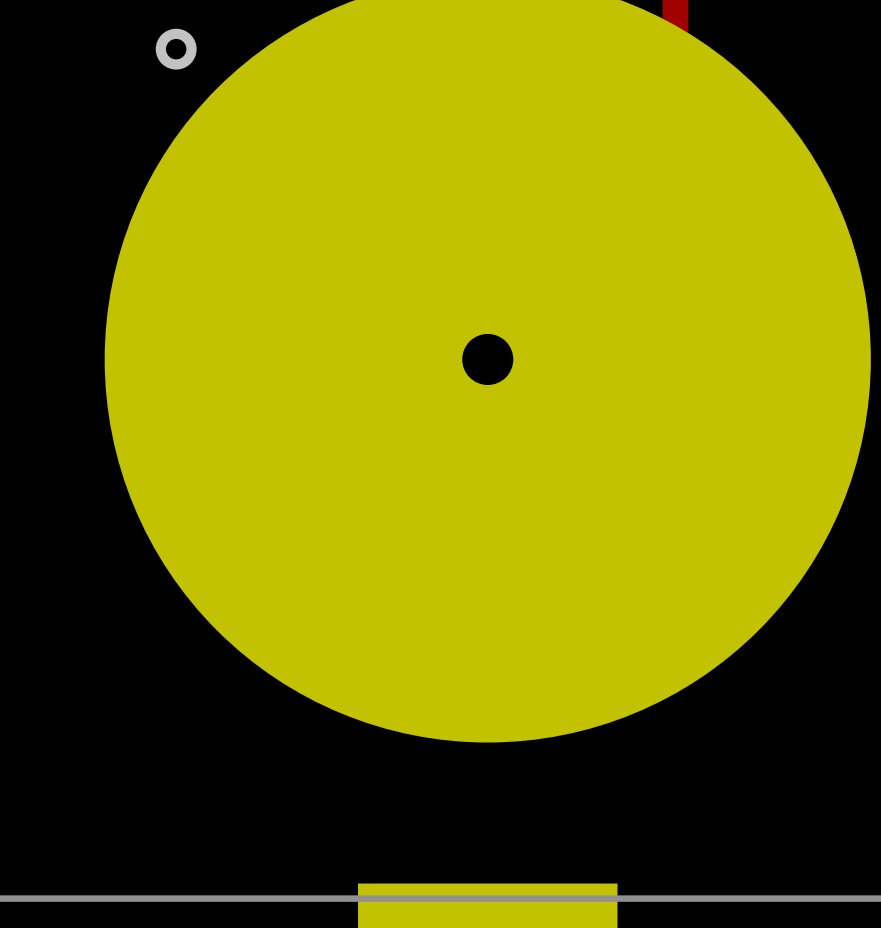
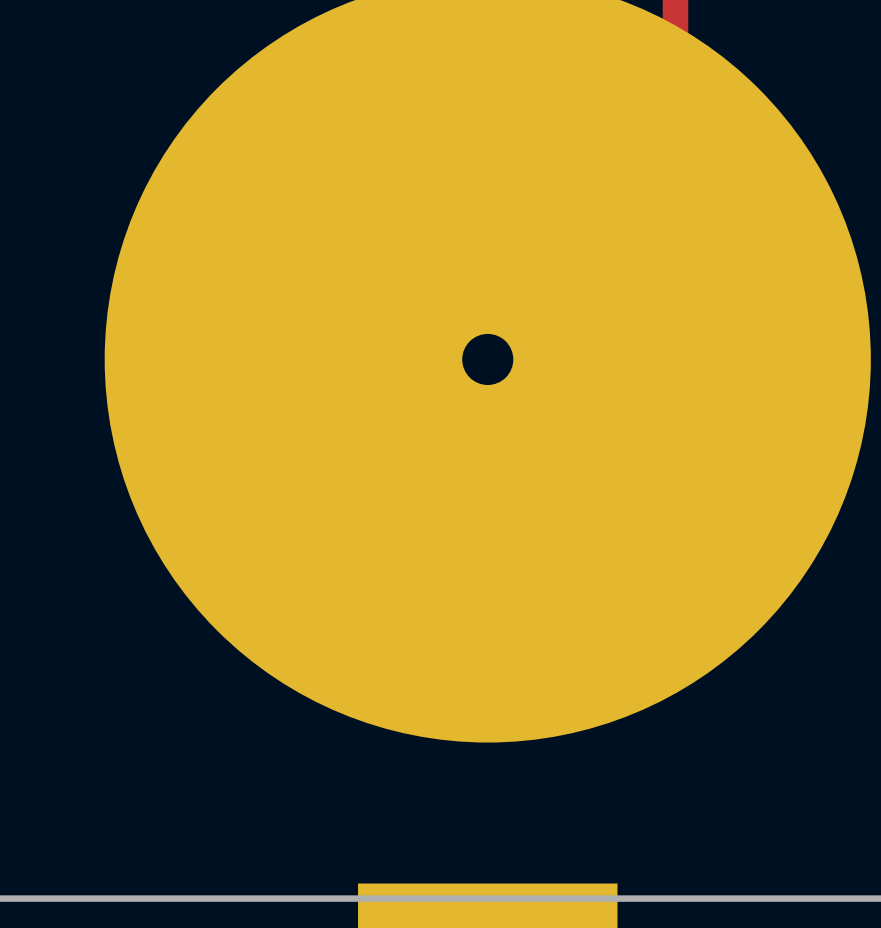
via: (176, 49) -> none

